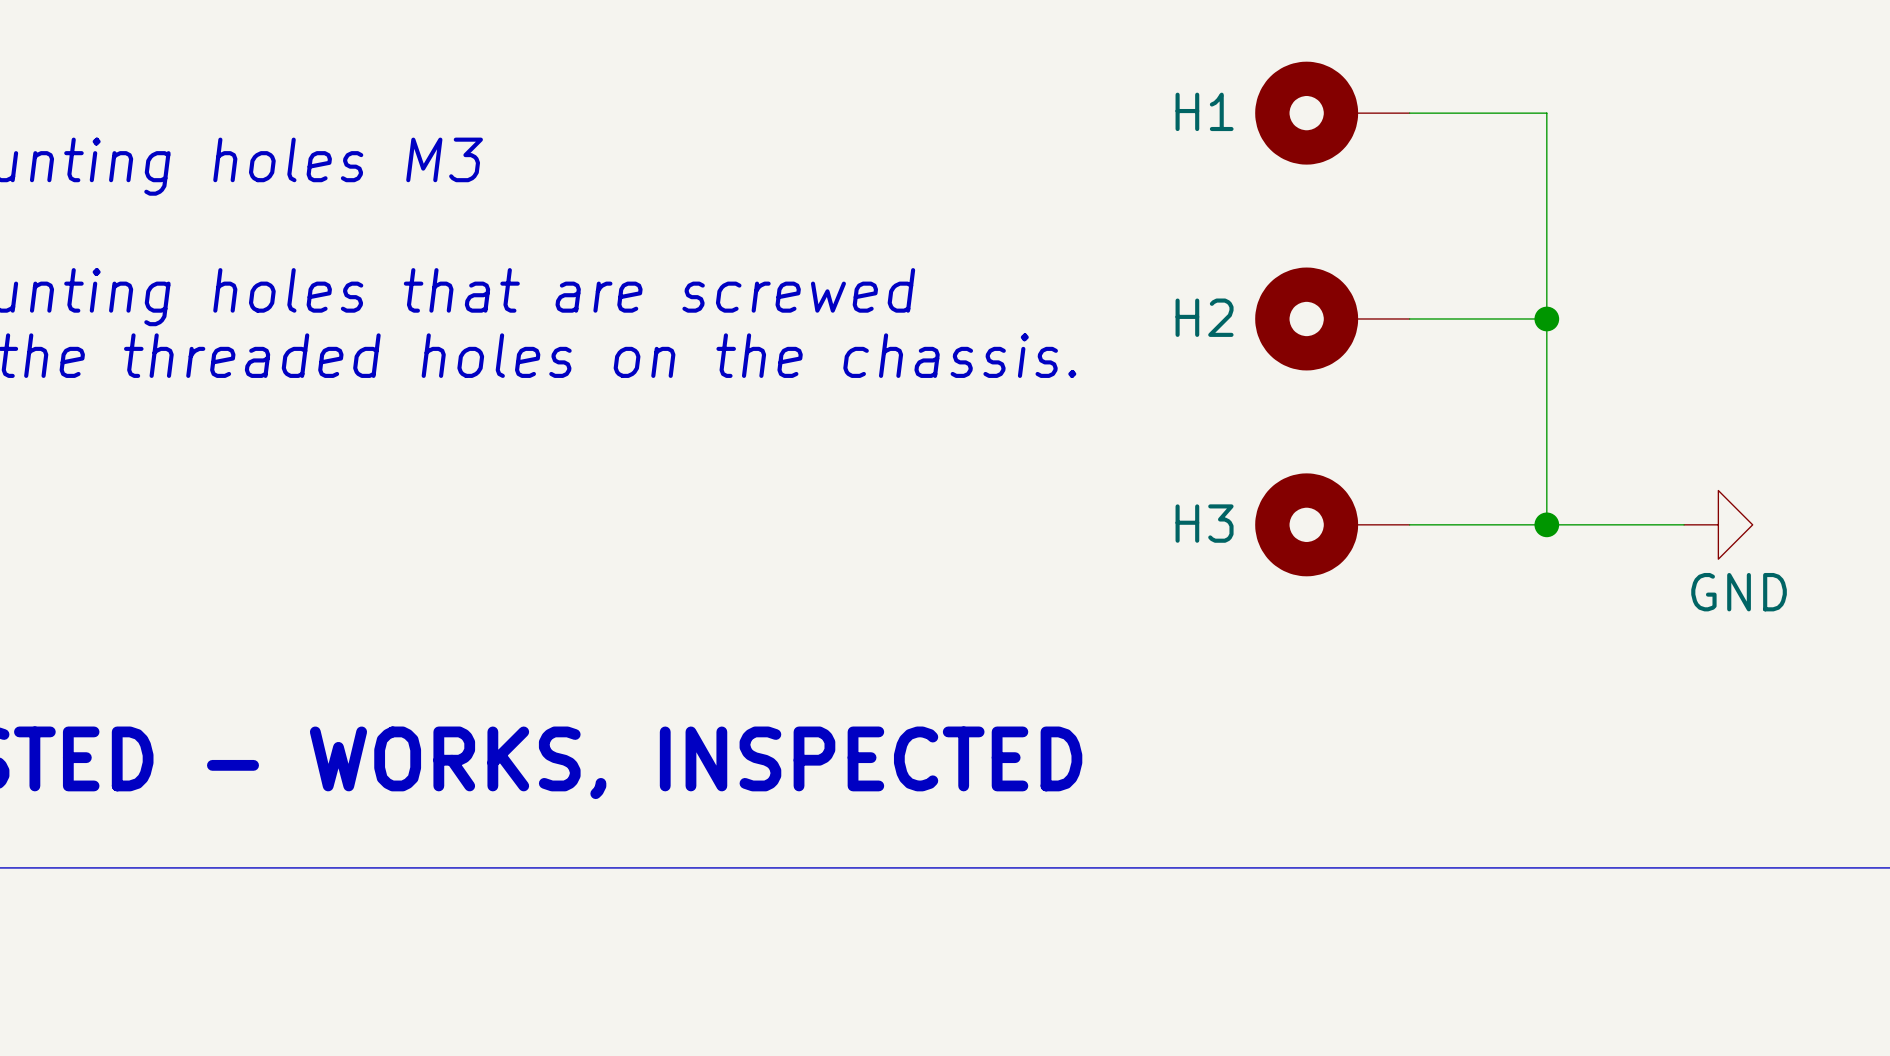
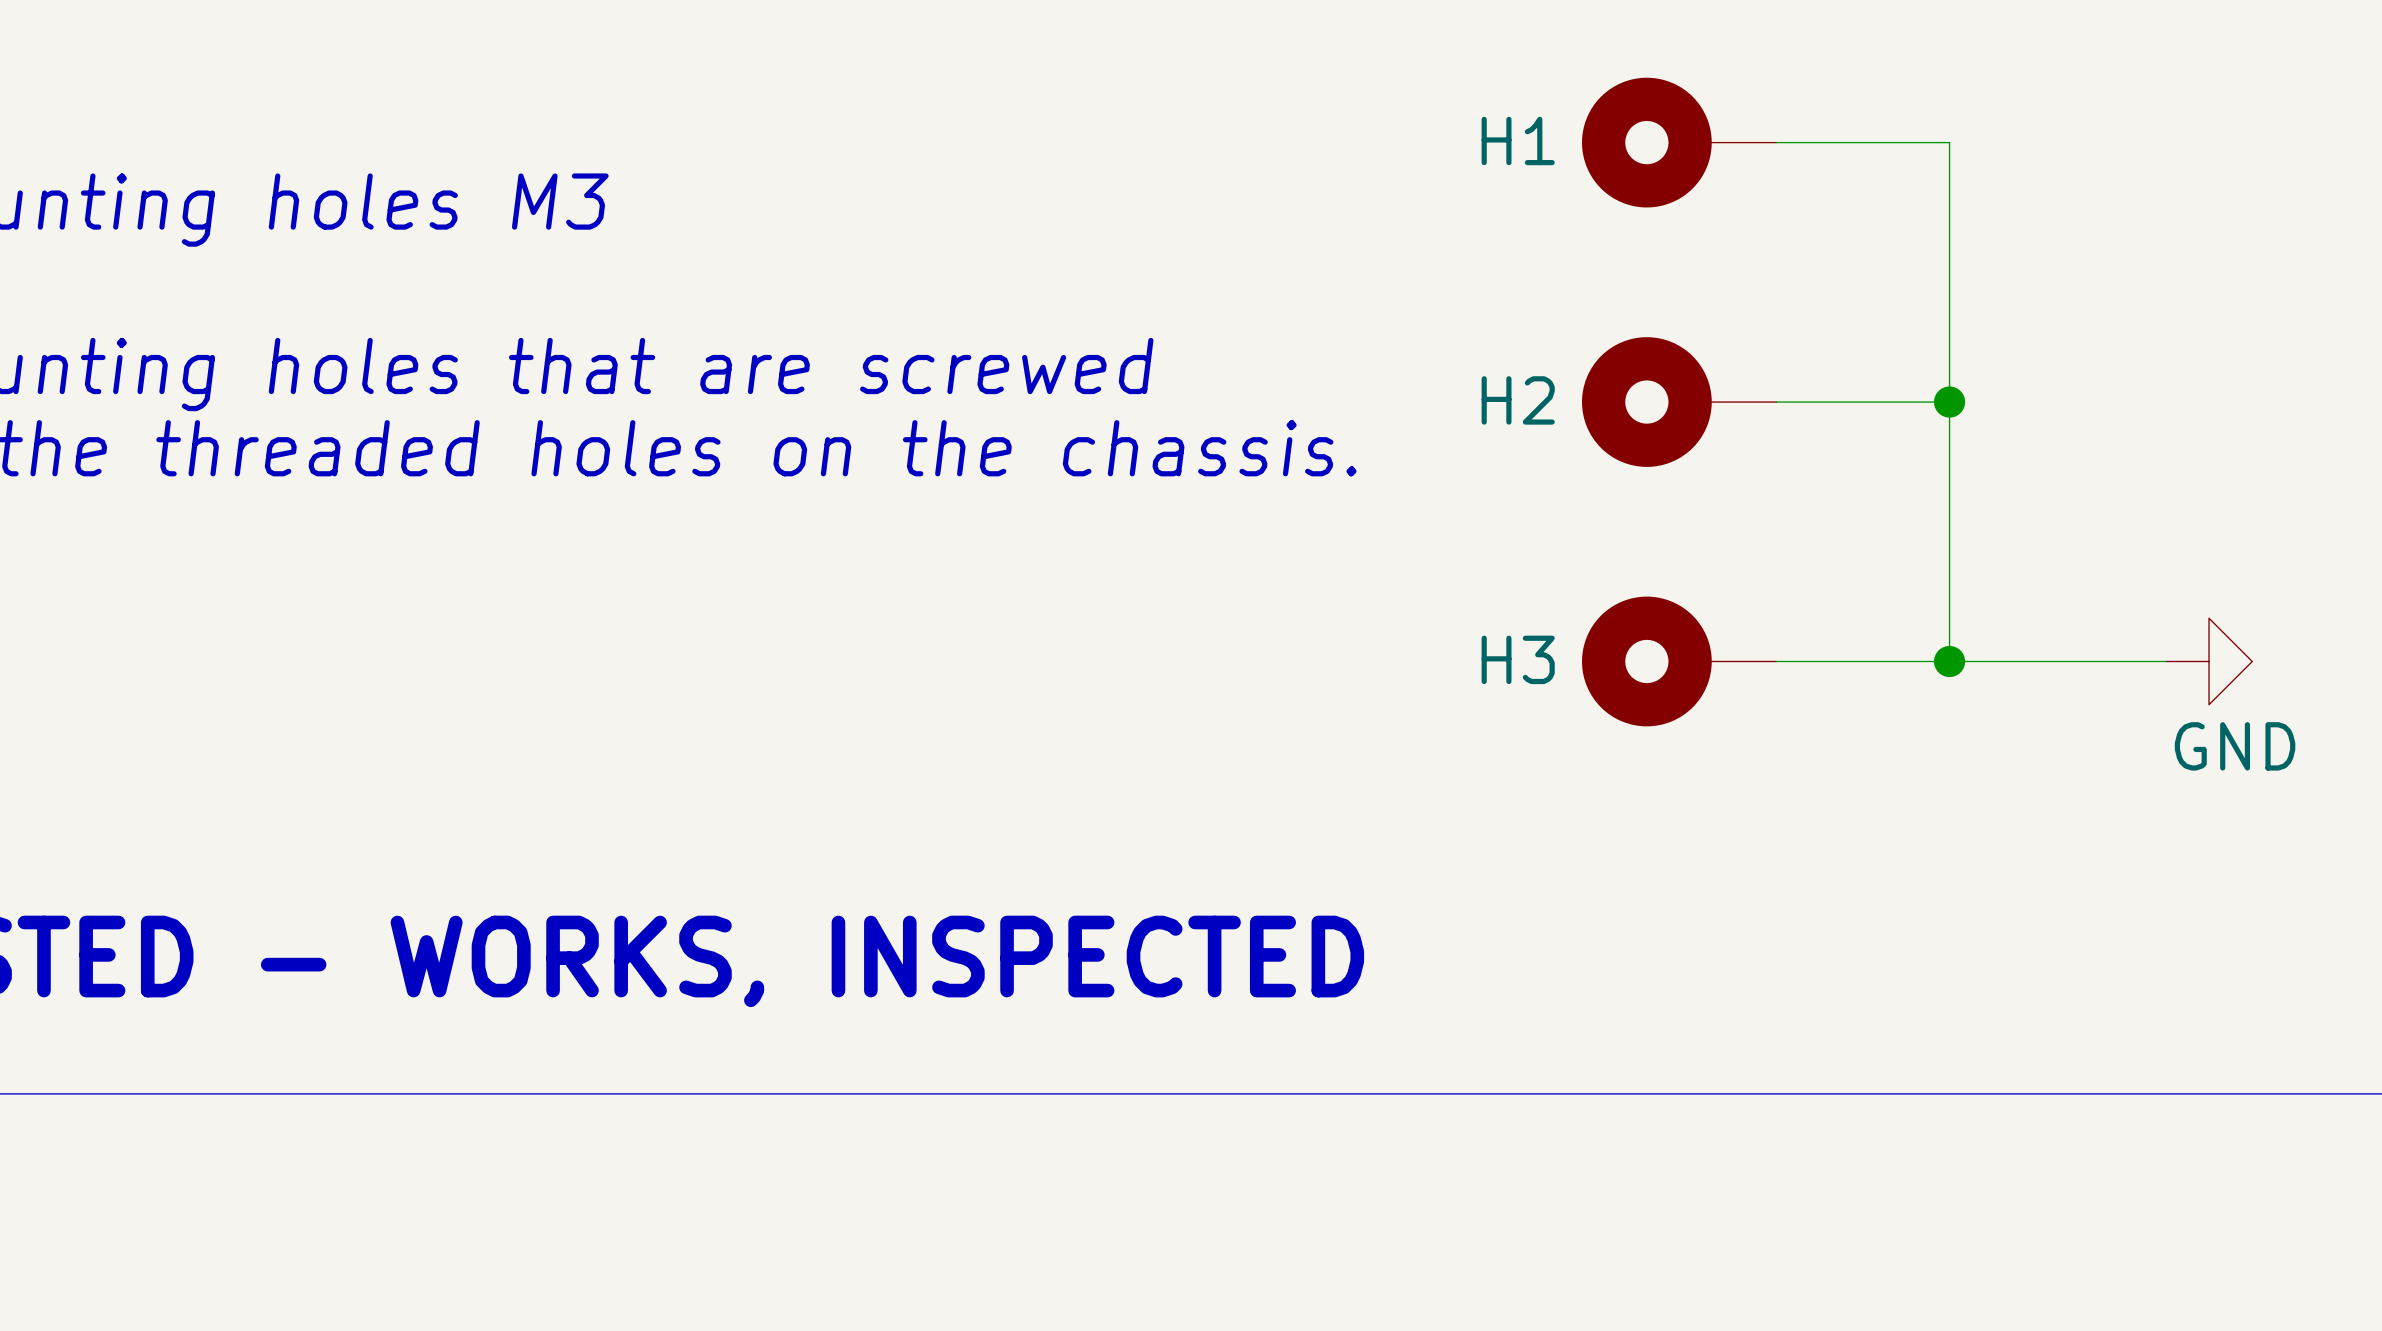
power symbol position: GND (1718, 524) -> GND (2209, 661)

